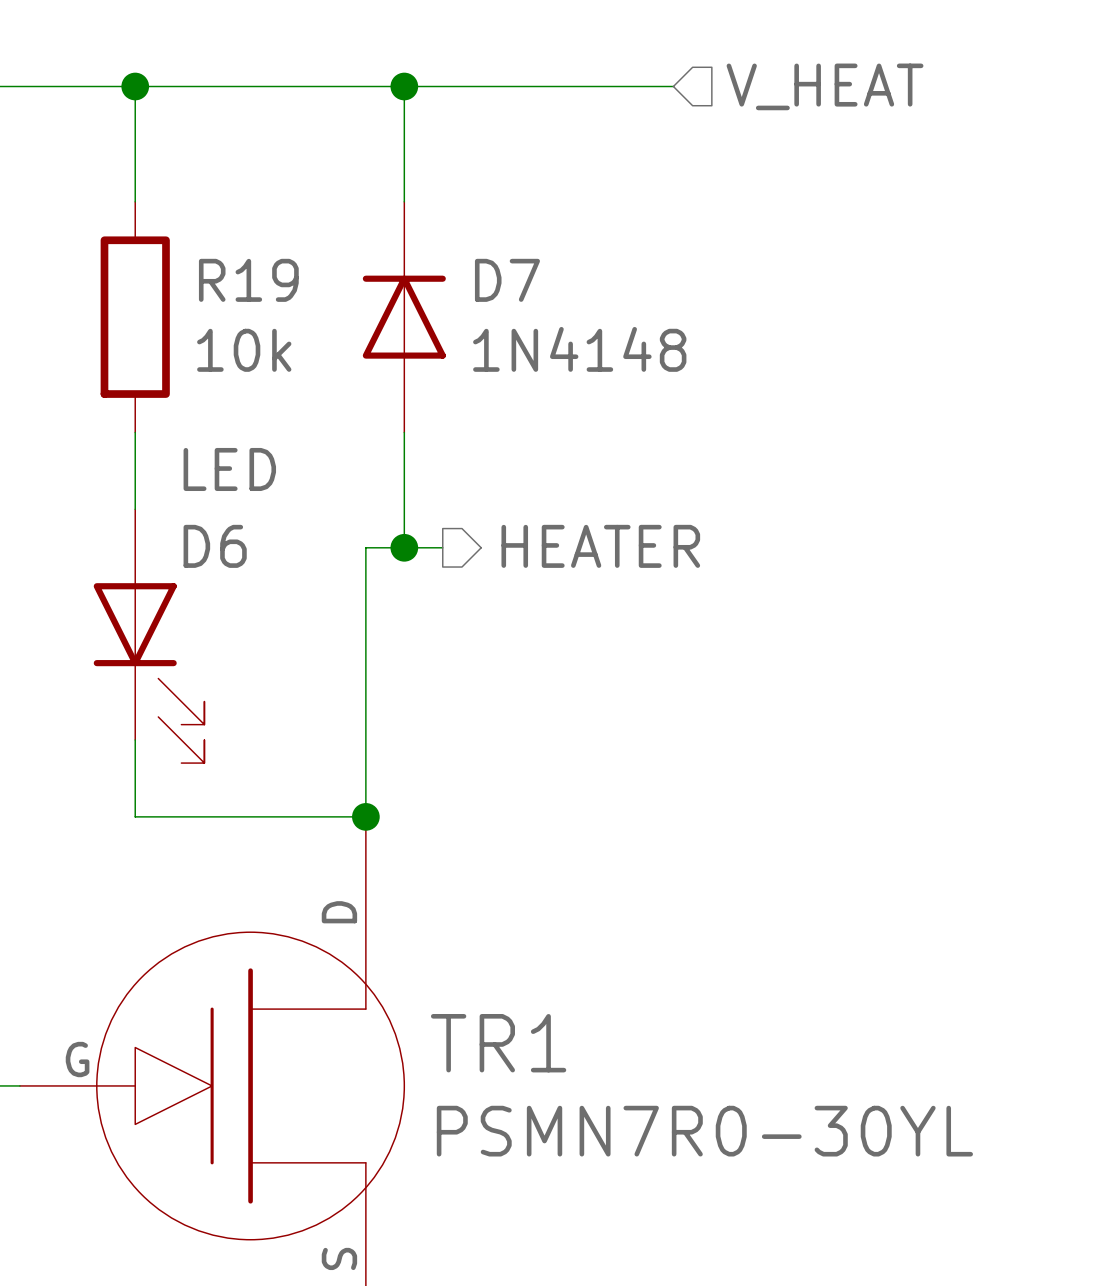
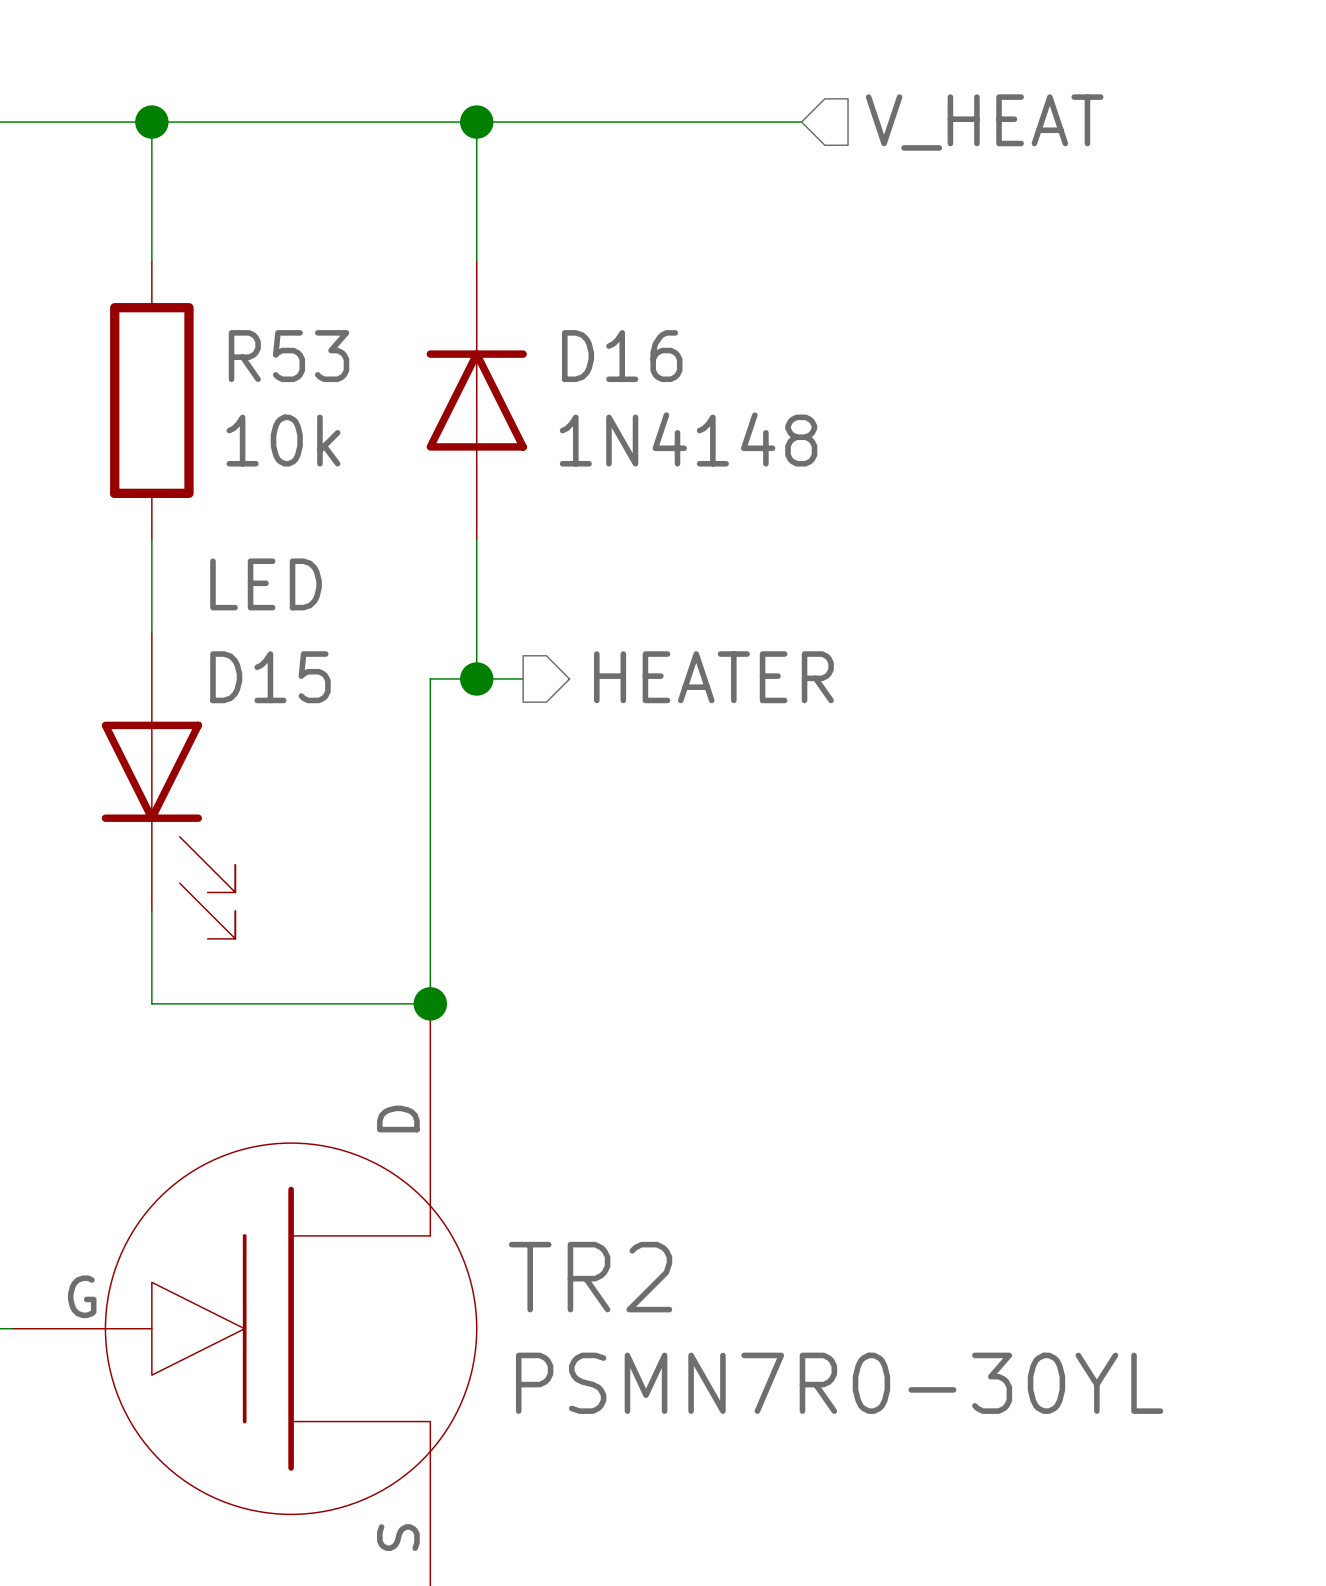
R19 name: R19 (248, 280) -> R53 (289, 356)
D7 name: D7 (507, 280) -> D16 (622, 356)
D6 name: D6 (215, 546) -> D15 (270, 677)
TR1 name: TR1 (498, 1043) -> TR2 (590, 1277)

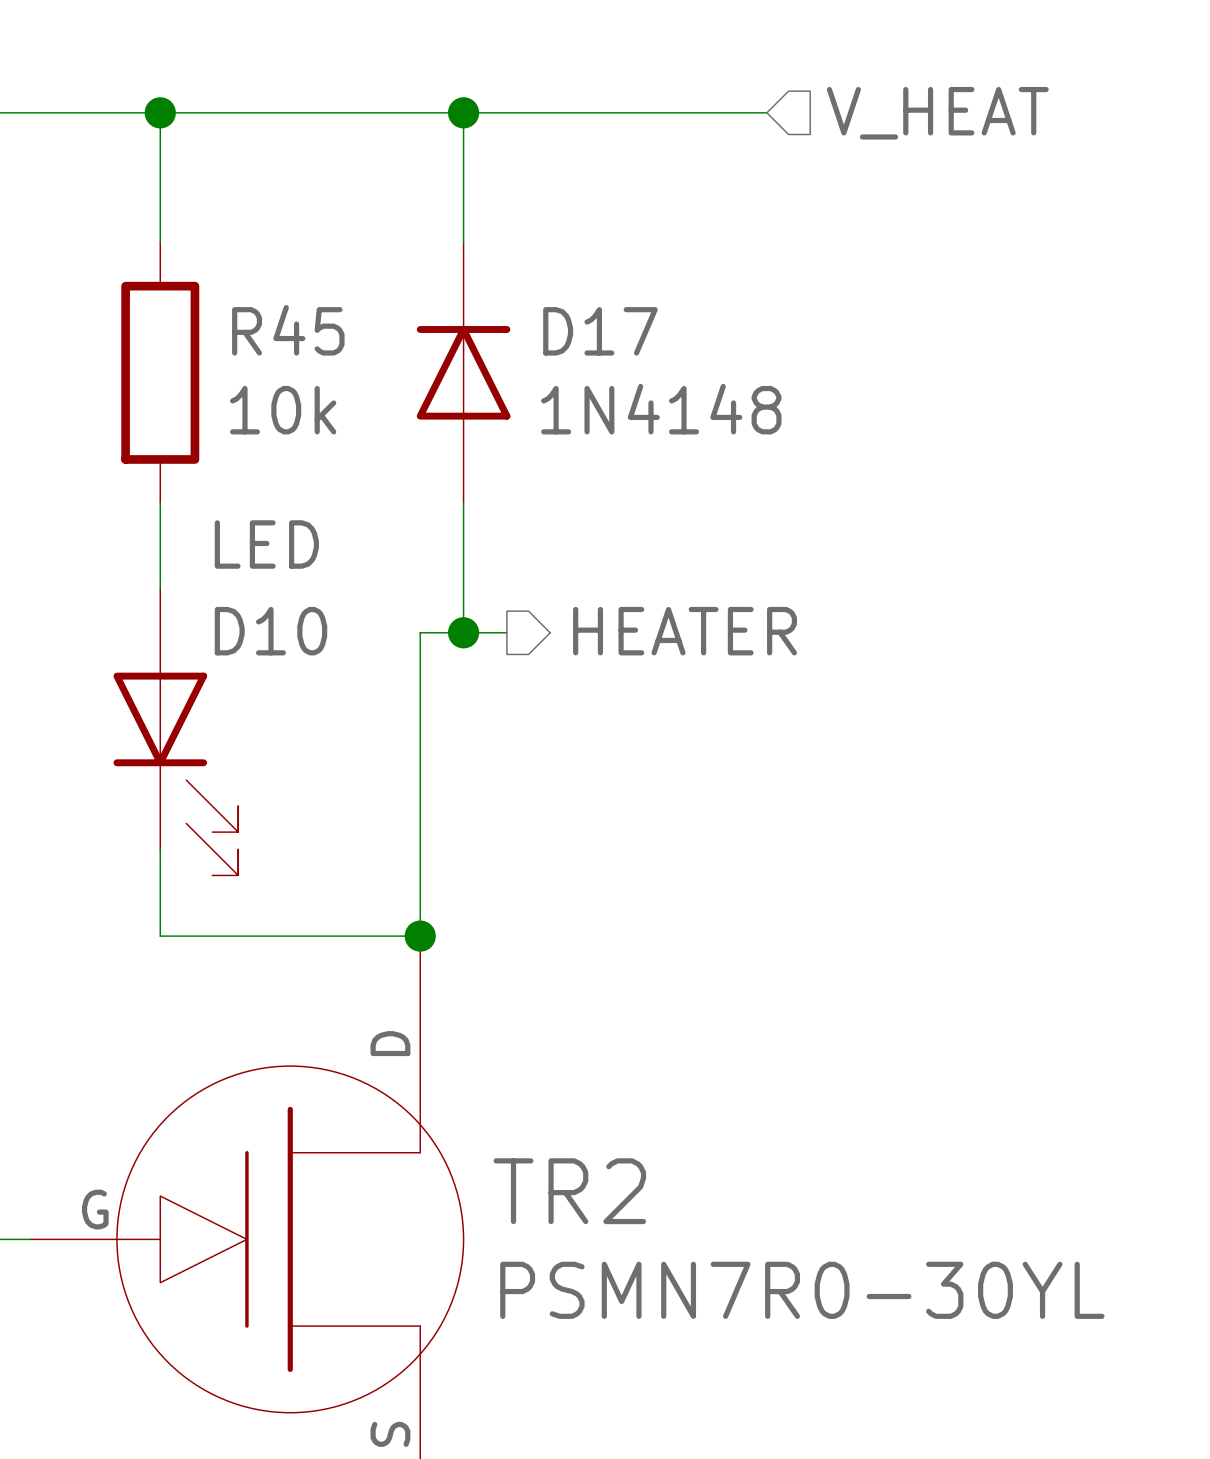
R53 name: R53 (289, 356) -> R45 (288, 330)
D16 name: D16 (622, 356) -> D17 (600, 331)
D15 name: D15 (270, 677) -> D10 (270, 631)

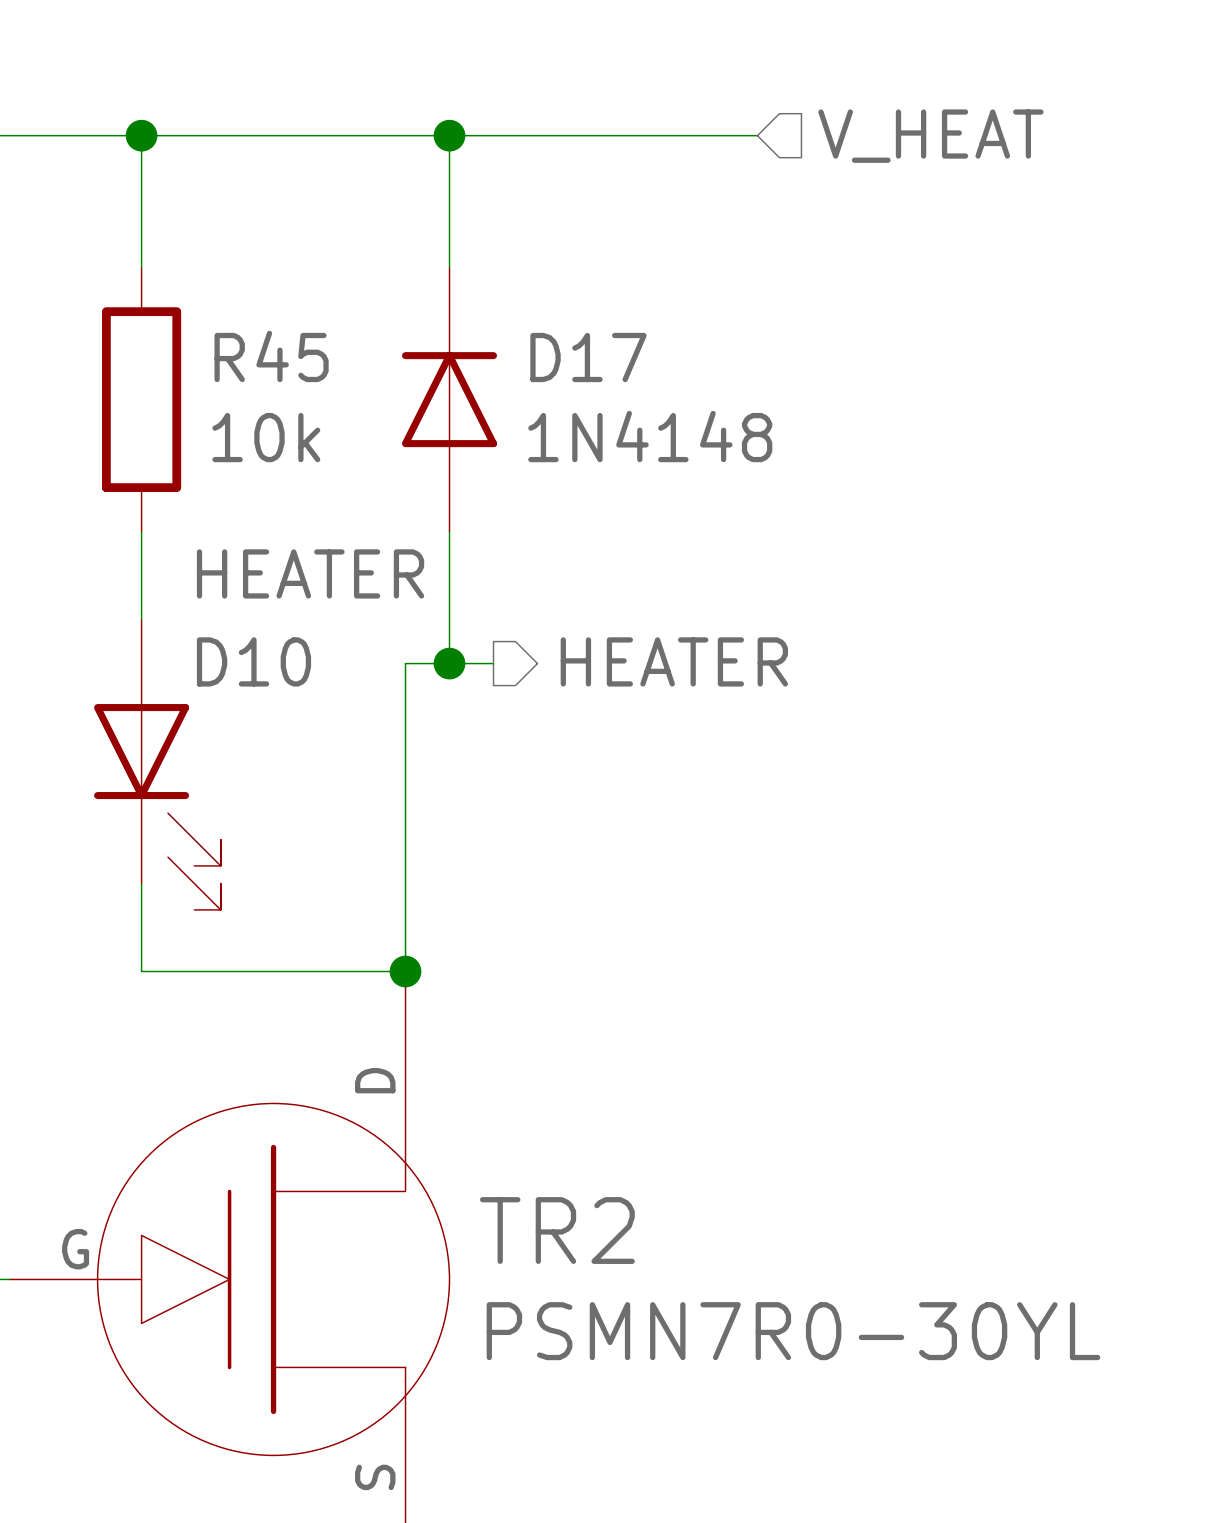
D10 value: LED (266, 544) -> HEATER (310, 573)

